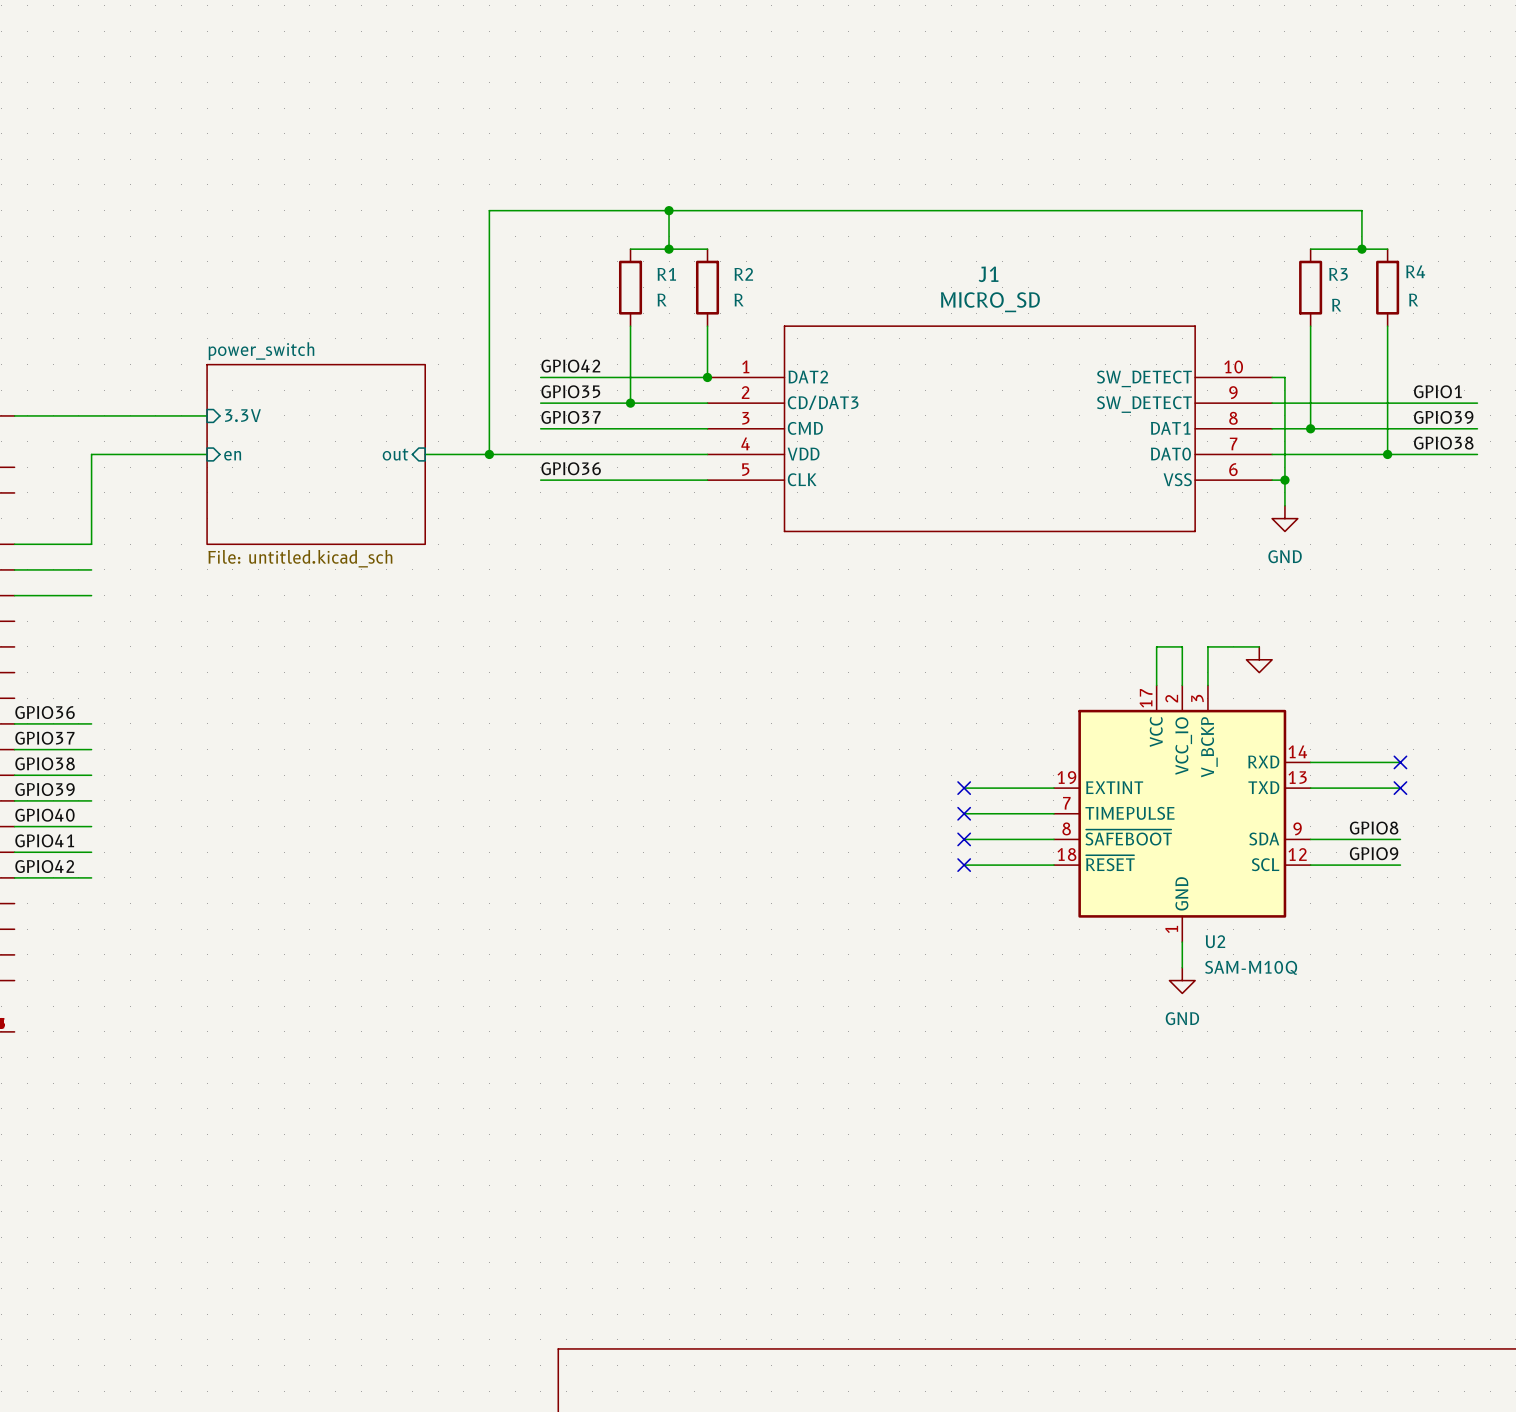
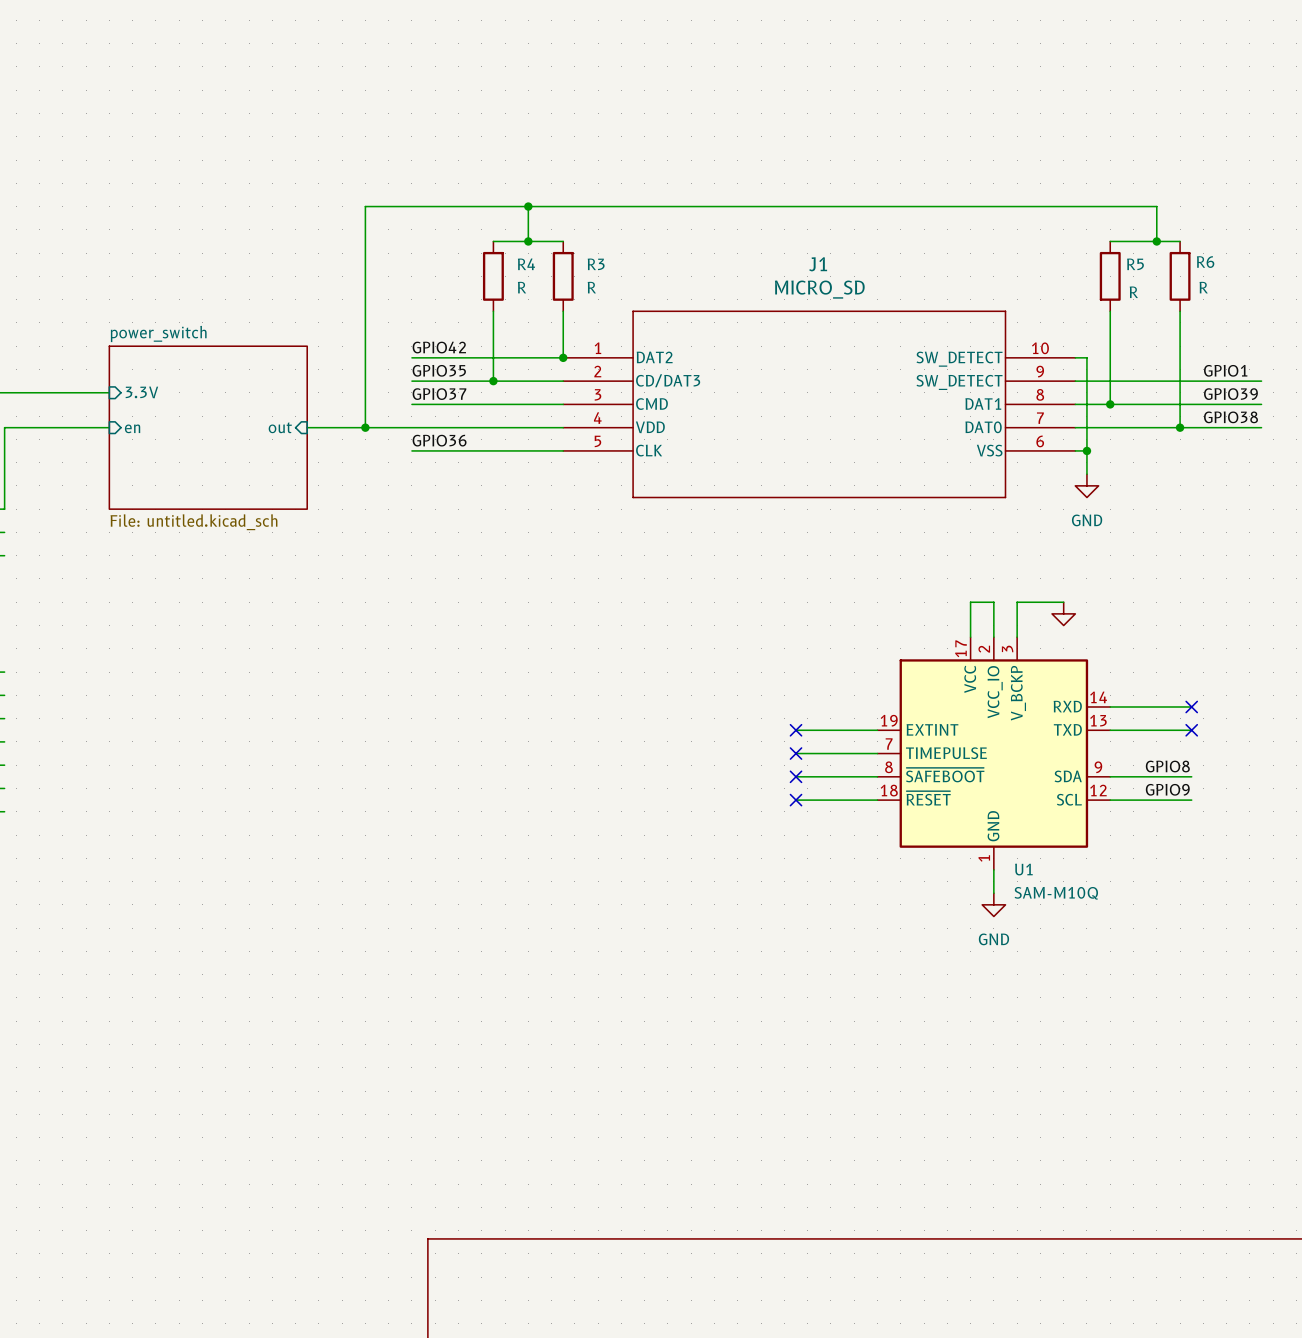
R4 name: R4 (1415, 271) -> R6 (1205, 262)
R1 name: R1 (666, 274) -> R4 (526, 264)
R2 name: R2 (743, 274) -> R3 (596, 264)
R3 name: R3 (1338, 274) -> R5 (1135, 264)
U2 name: U2 (1215, 941) -> U1 (1023, 869)

